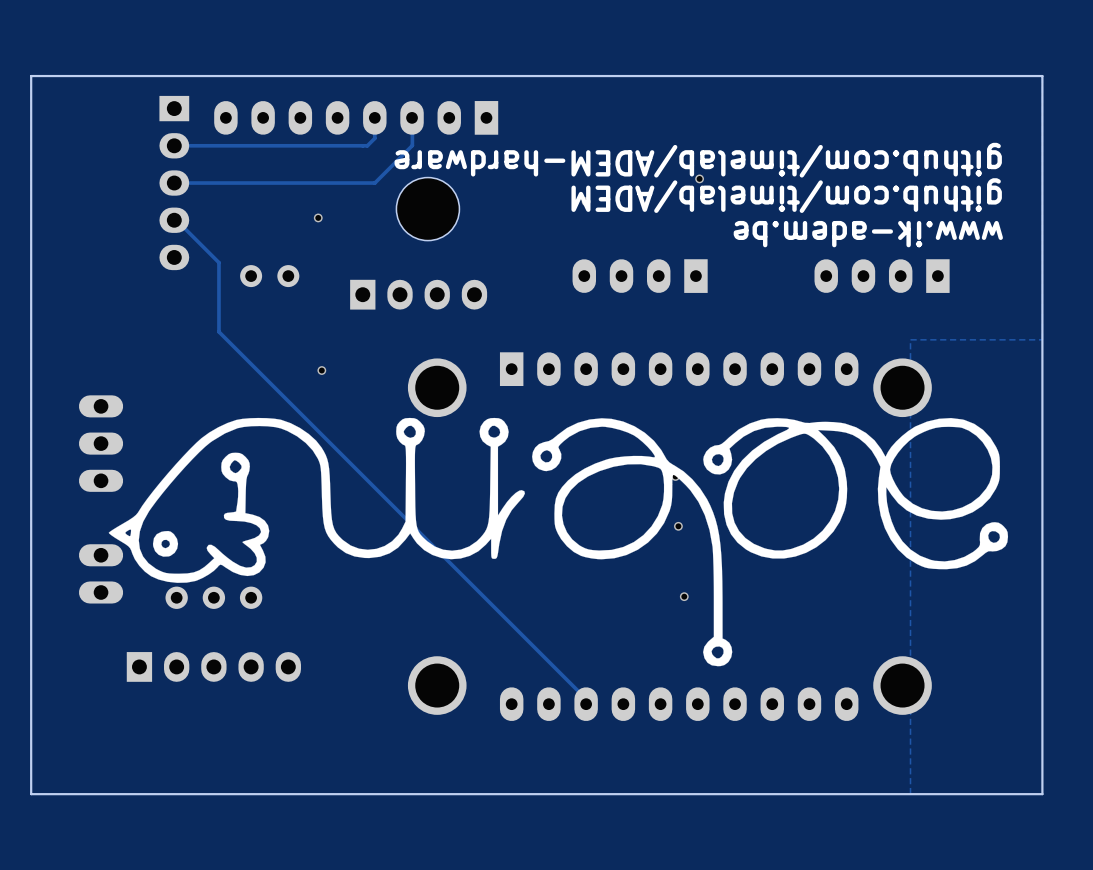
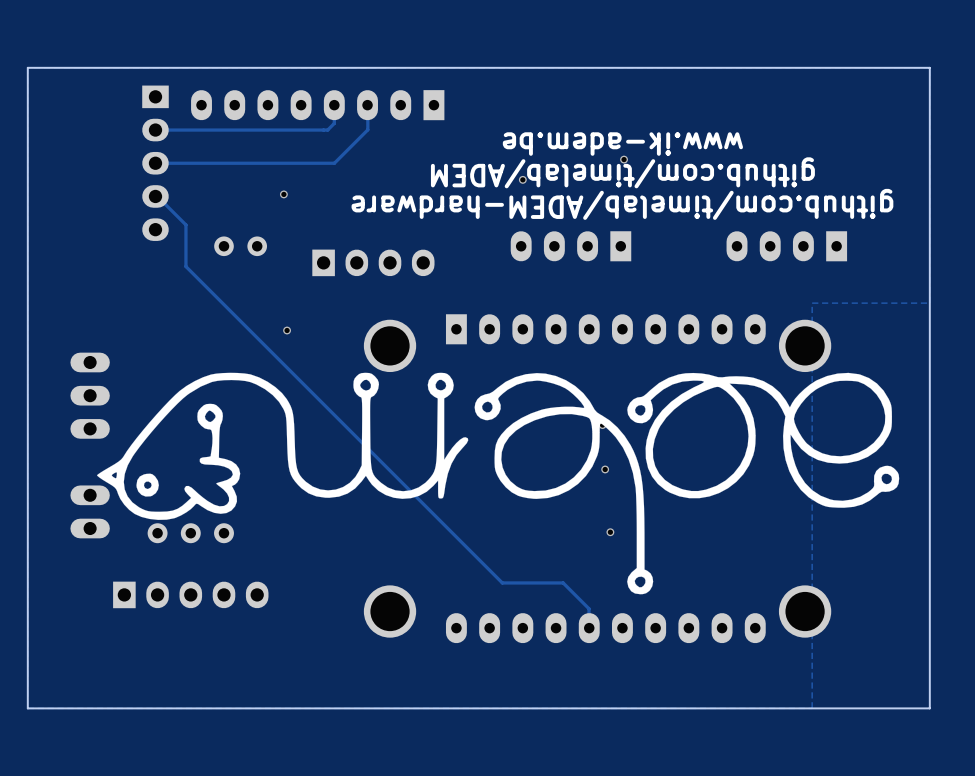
text position: github.com/timelab/ADEM-hardware (698, 160) -> github.com/timelab/ADEM-hardware (622, 204)
text position: github.com/timelab/ADEM (786, 195) -> github.com/timelab/ADEM (622, 172)
part: (427, 209) -> none
text position: www.ik-adem.be (868, 234) -> www.ik-adem.be (622, 144)
track: (208, 252) (218, 262) (218, 331) (586, 699) (586, 704) -> (185, 224) (185, 266) (502, 582) (563, 582) (589, 608) (589, 628)

